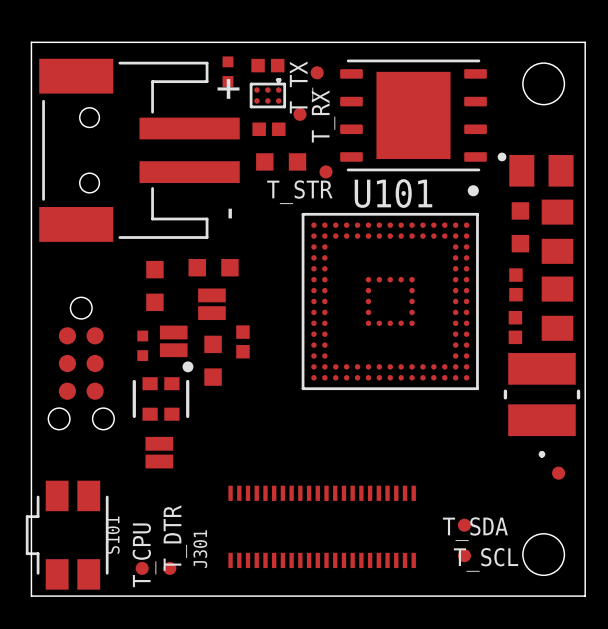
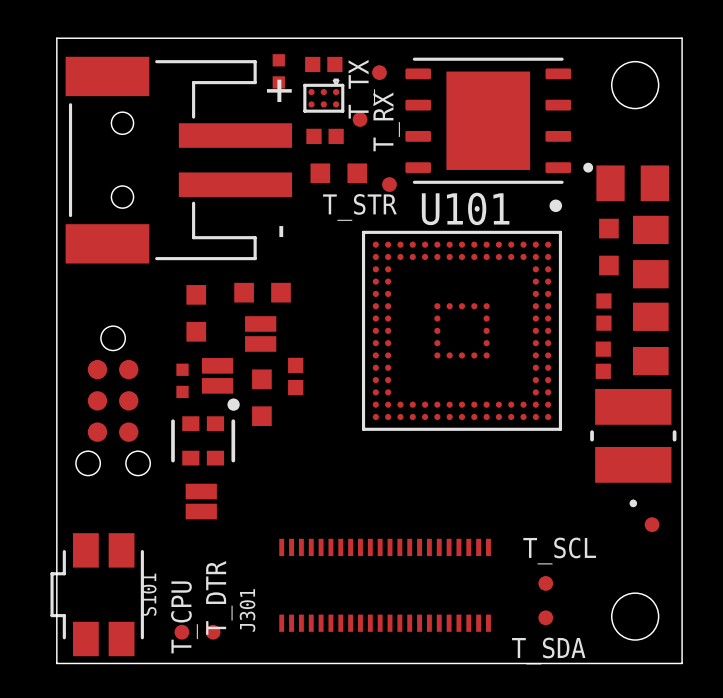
T_SDA name: T_SDA (475, 529) -> T_SCL (559, 551)
T_SCL name: T_SCL (486, 559) -> T_SDA (548, 651)

